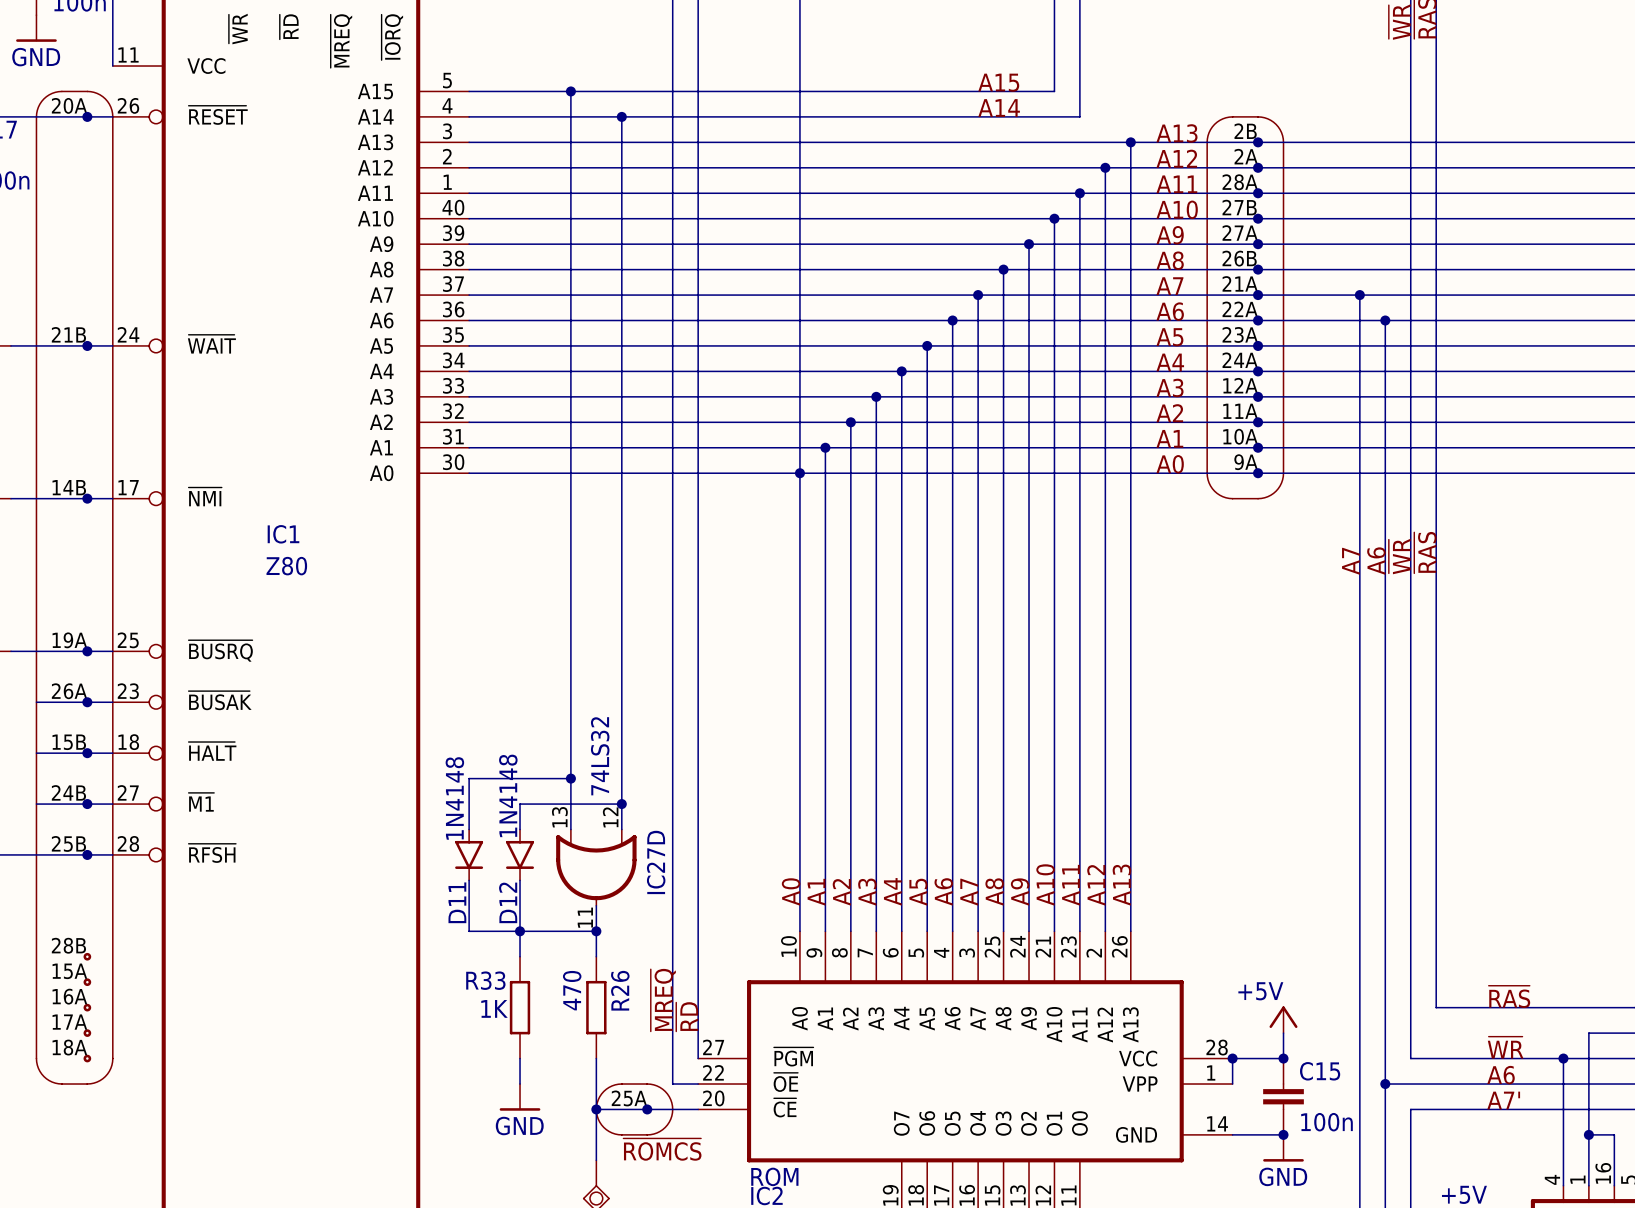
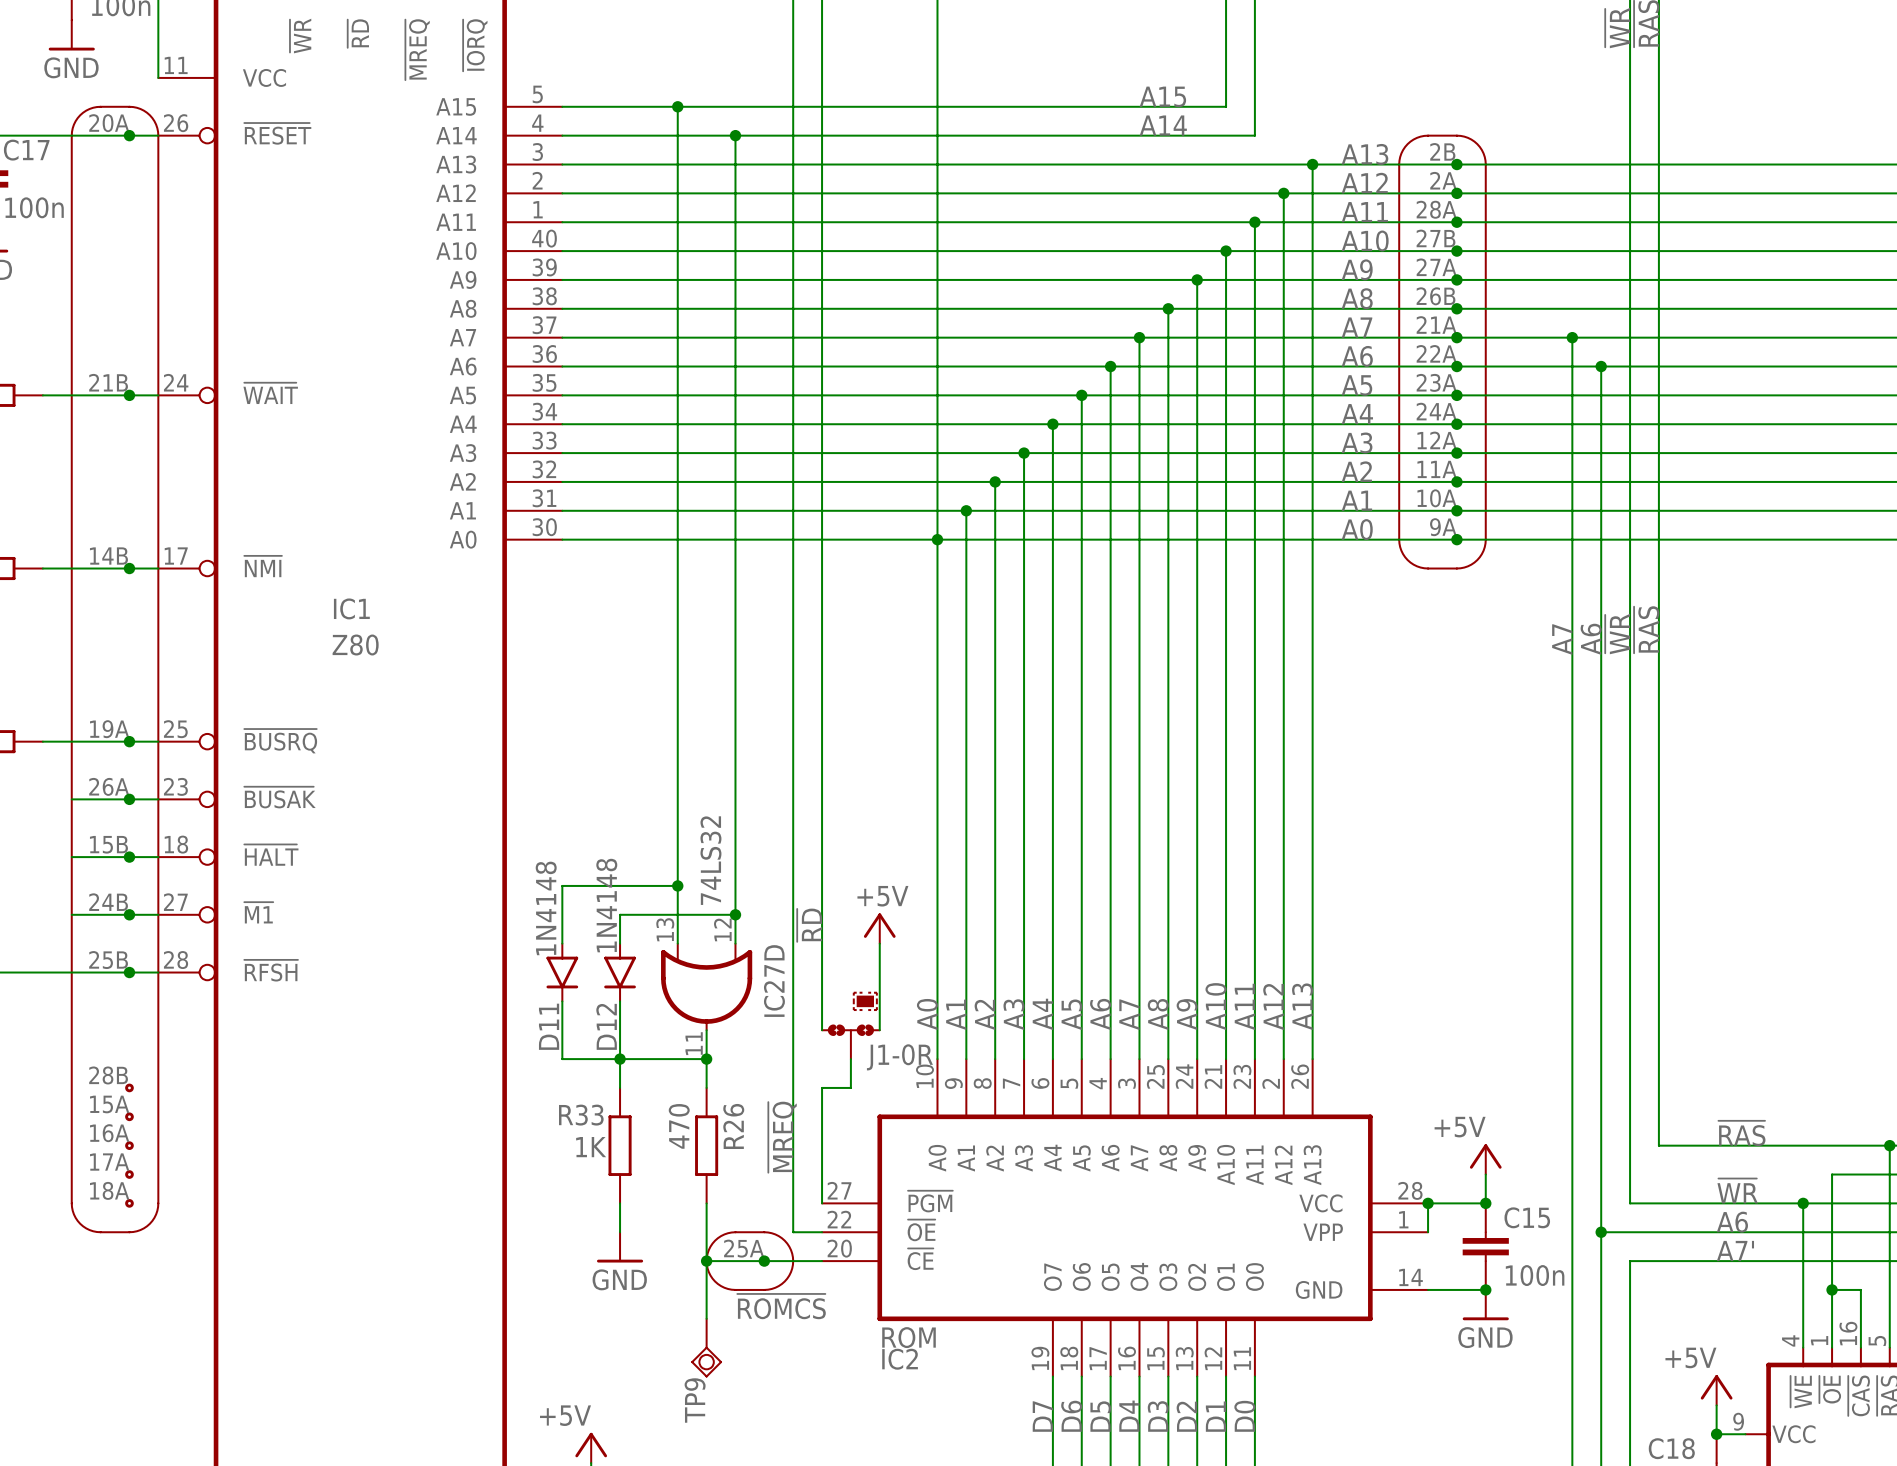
power symbol: none -> +5V (879, 928)
wire: none -> (879, 943) (879, 1030)
part: none -> (865, 1001)
wire: (698, 905) (698, 956) -> (850, 1059) (850, 1087) (822, 1087)
J1-0R: none -> (850, 1041)
label position: ~{RD} (687, 1016) -> ~{RD} (809, 925)

